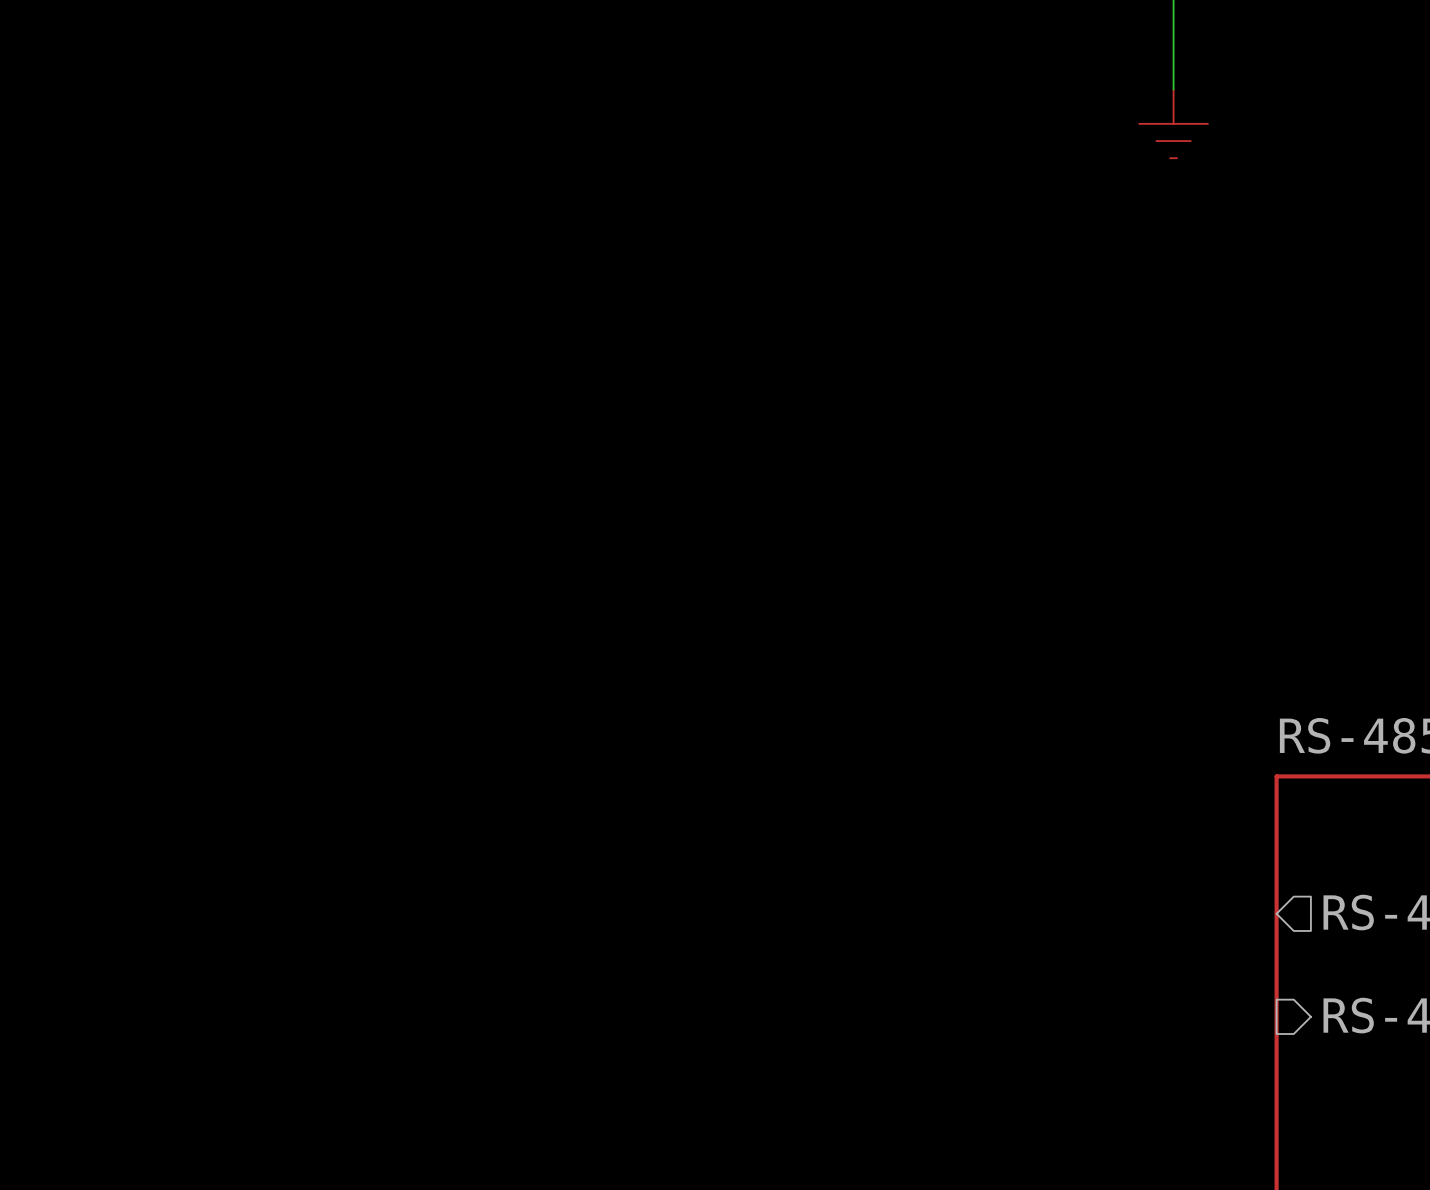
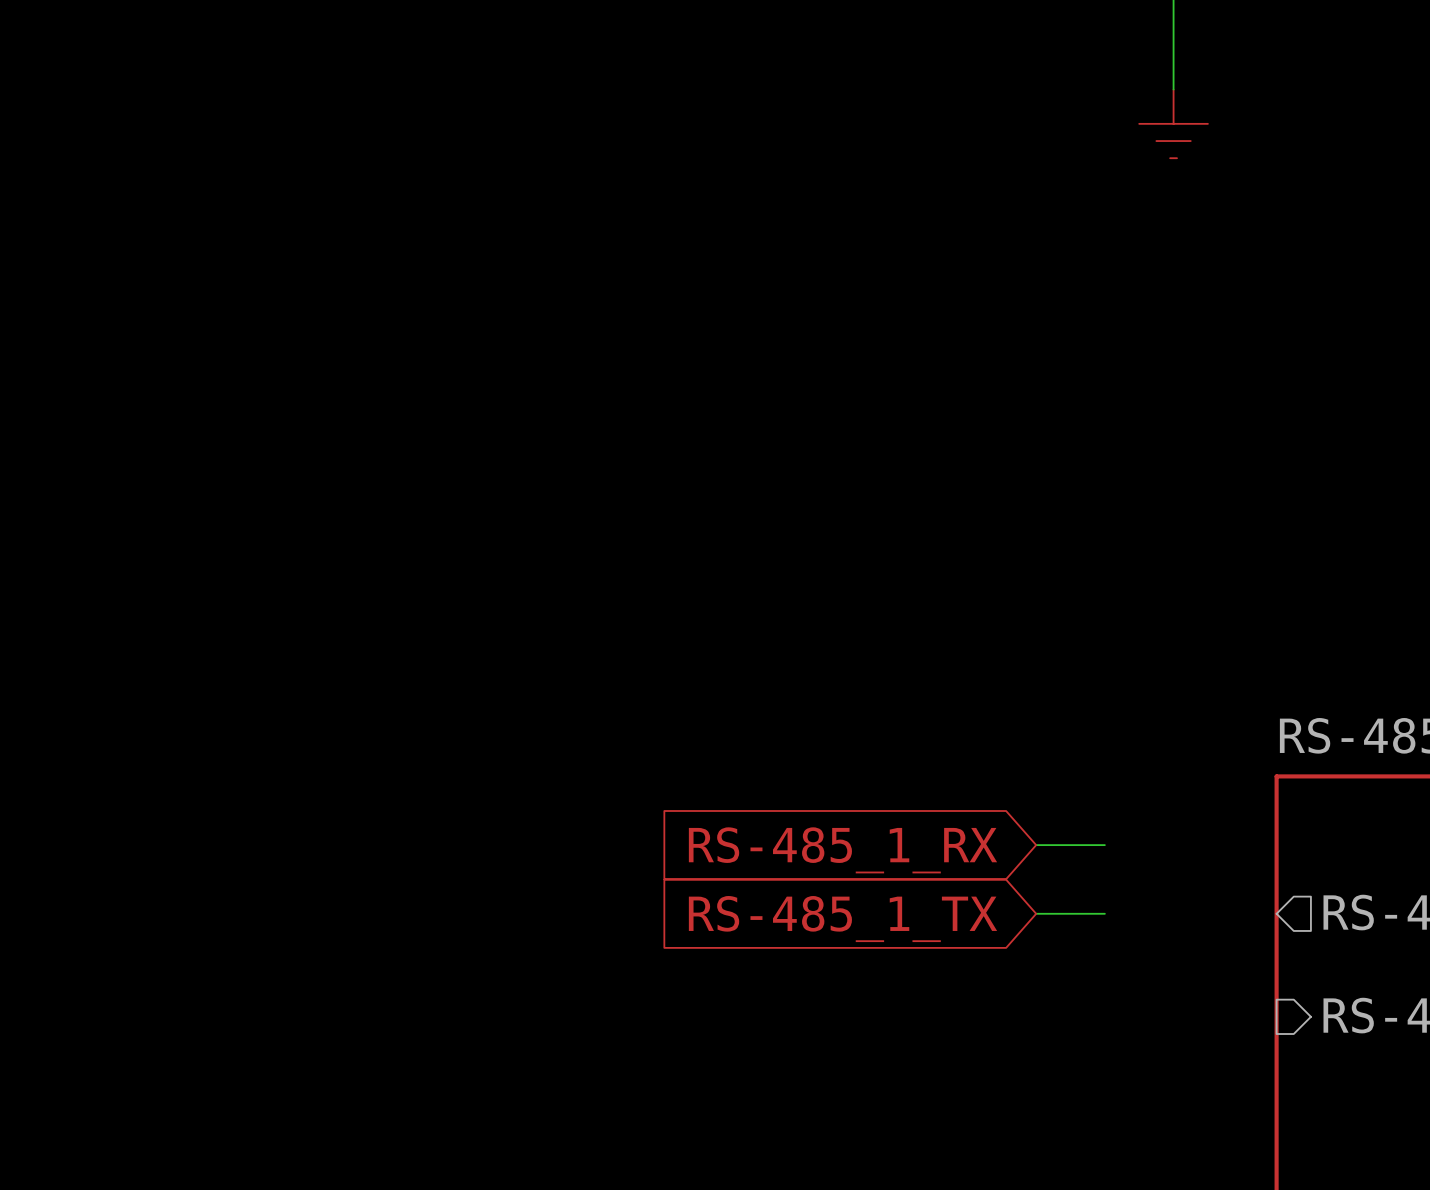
wire: none -> (1036, 845) (1104, 845)
global label: none -> RS-485_1_RX (842, 850)
wire: none -> (1036, 913) (1104, 913)
global label: none -> RS-485_1_TX (842, 919)

